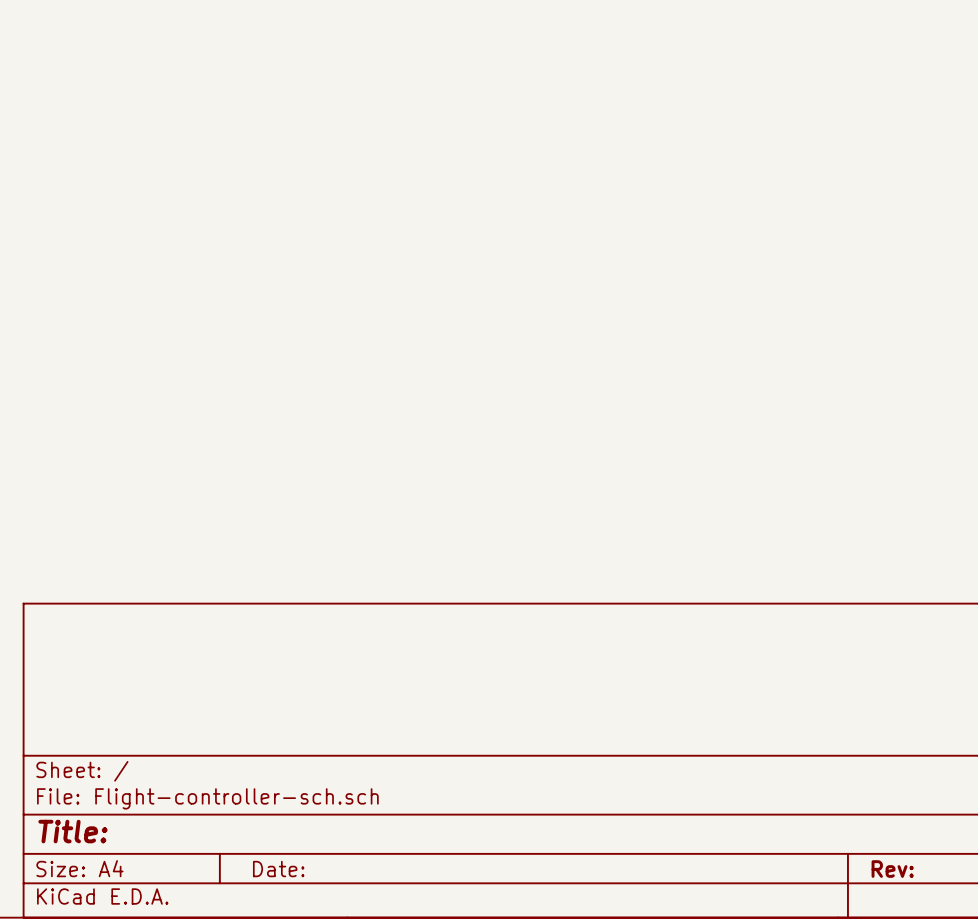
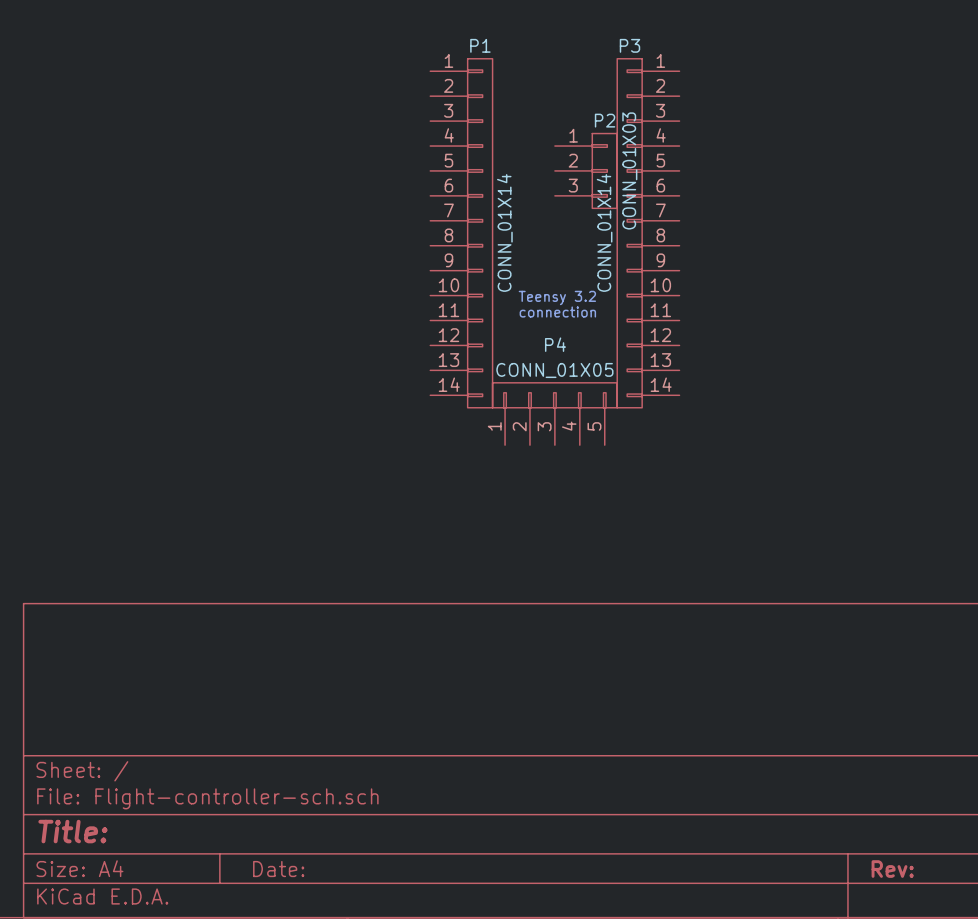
P2: none -> CONN_01X03 (586, 170)
P1: none -> CONN_01X14 (461, 233)
P3: none -> CONN_01X14 (648, 233)
text: none -> Teensy 3.2 (557, 297)
text: none -> connection (557, 312)
P4: none -> CONN_01X05 (554, 413)

